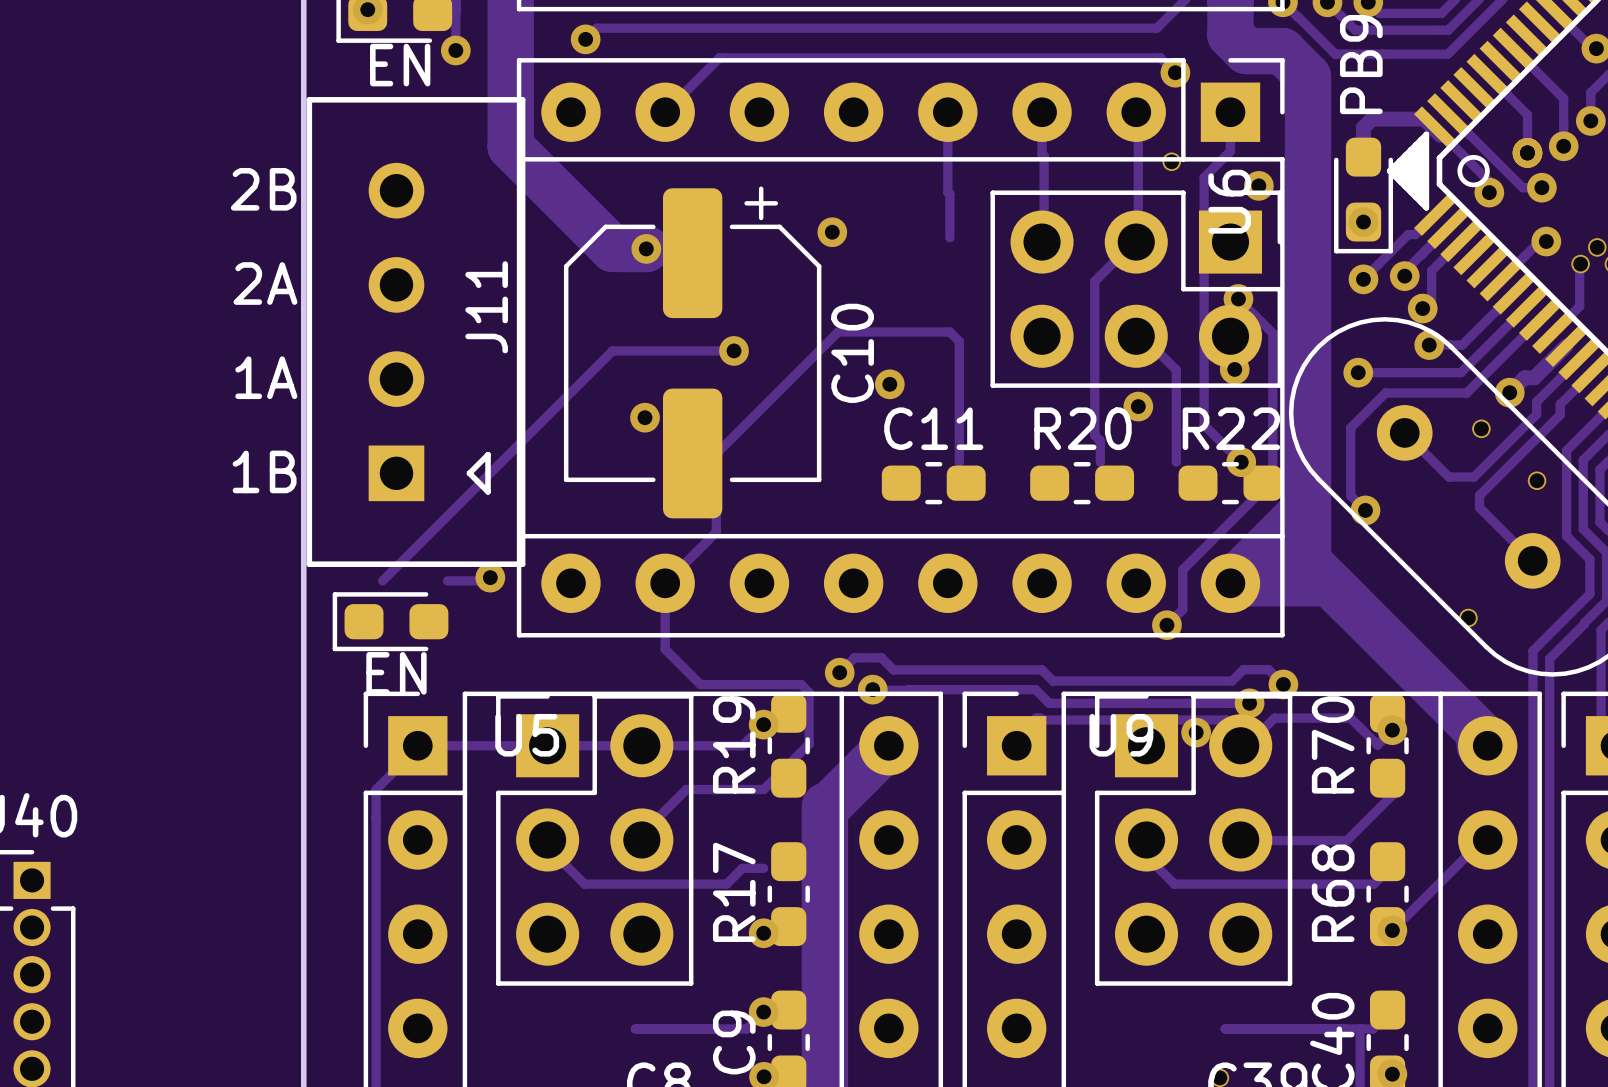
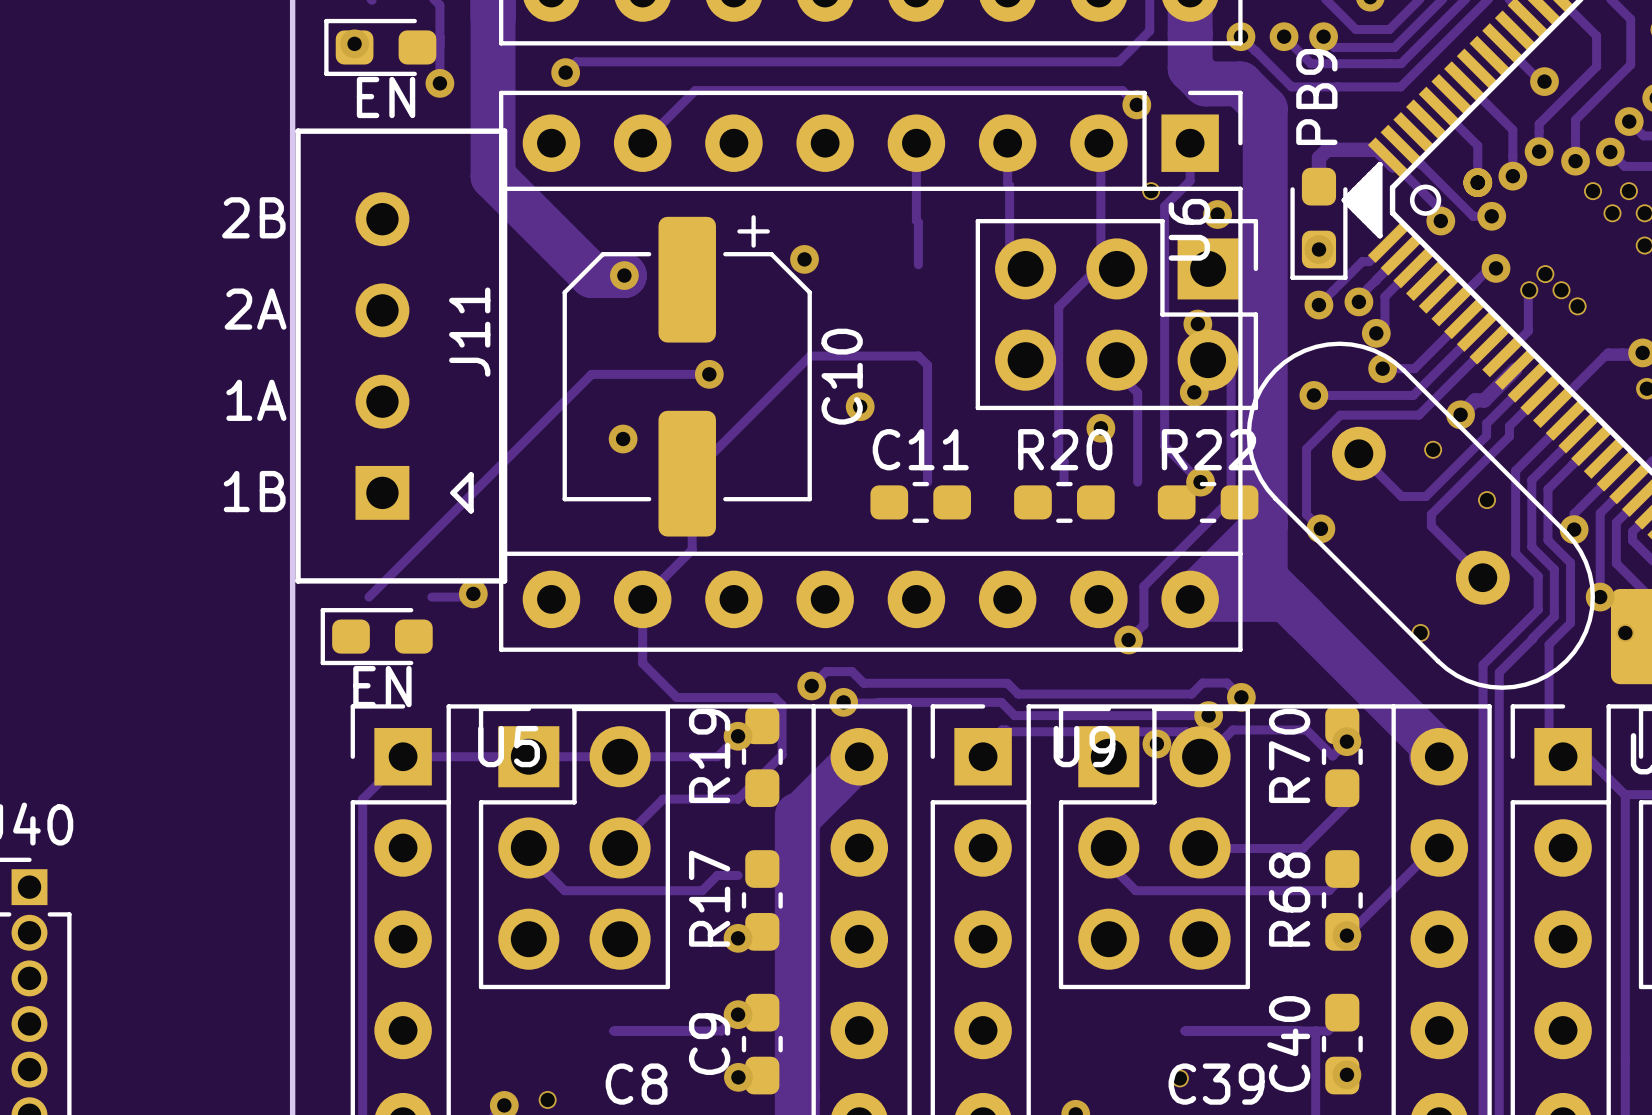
via position: (1171, 161) -> (1151, 191)
part position: (1136, 289) -> (1116, 314)
C10 position: (692, 352) -> (687, 375)
C11 position: (933, 483) -> (920, 502)
R20 position: (1082, 483) -> (1064, 502)
R22 position: (1230, 483) -> (1208, 502)

